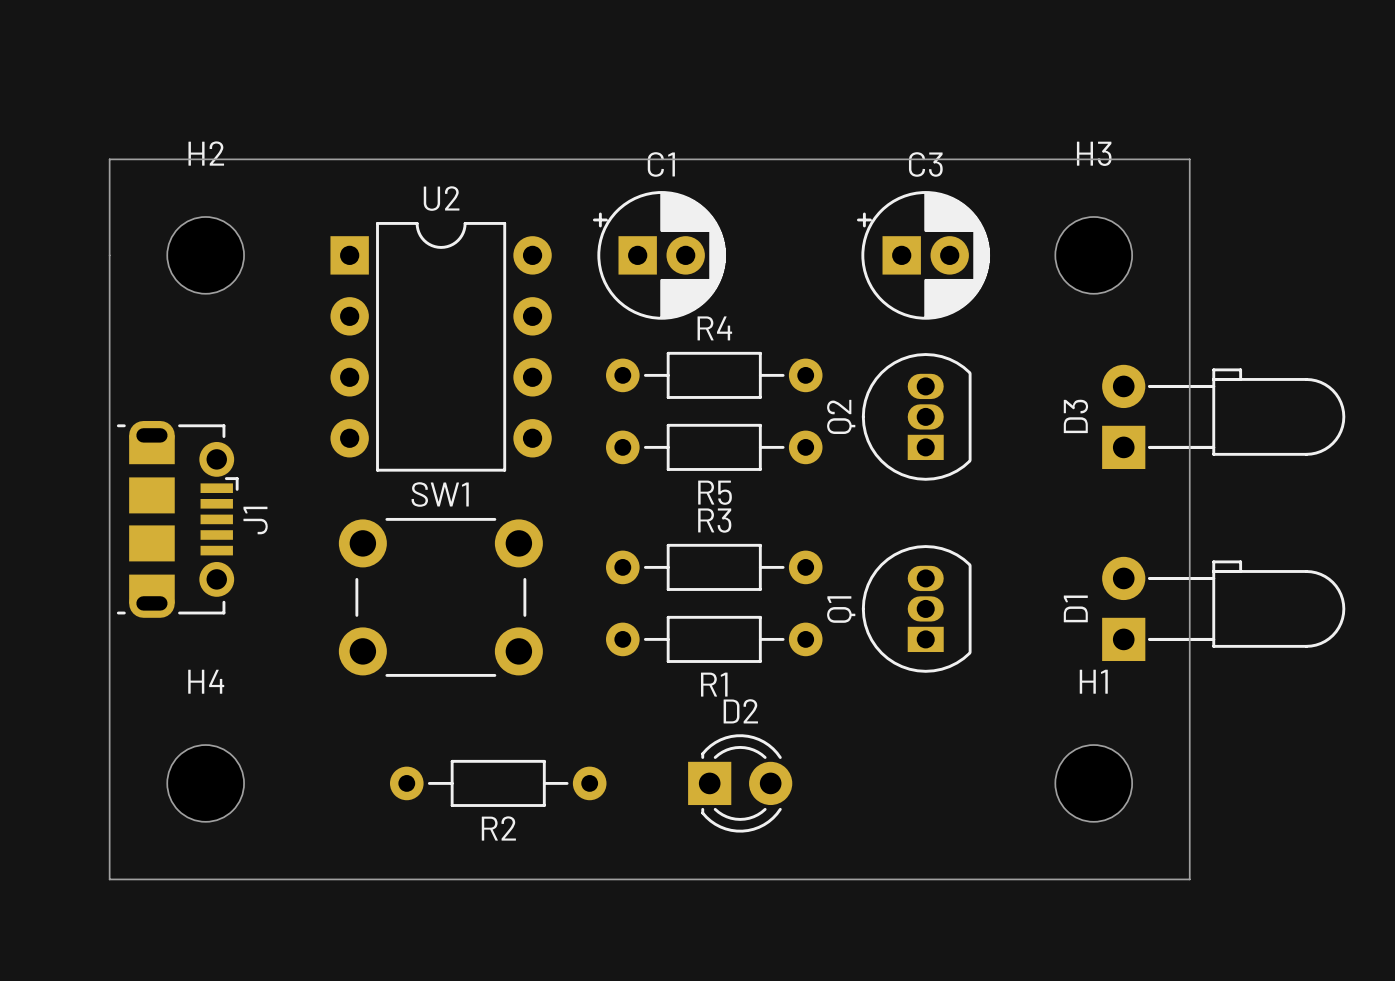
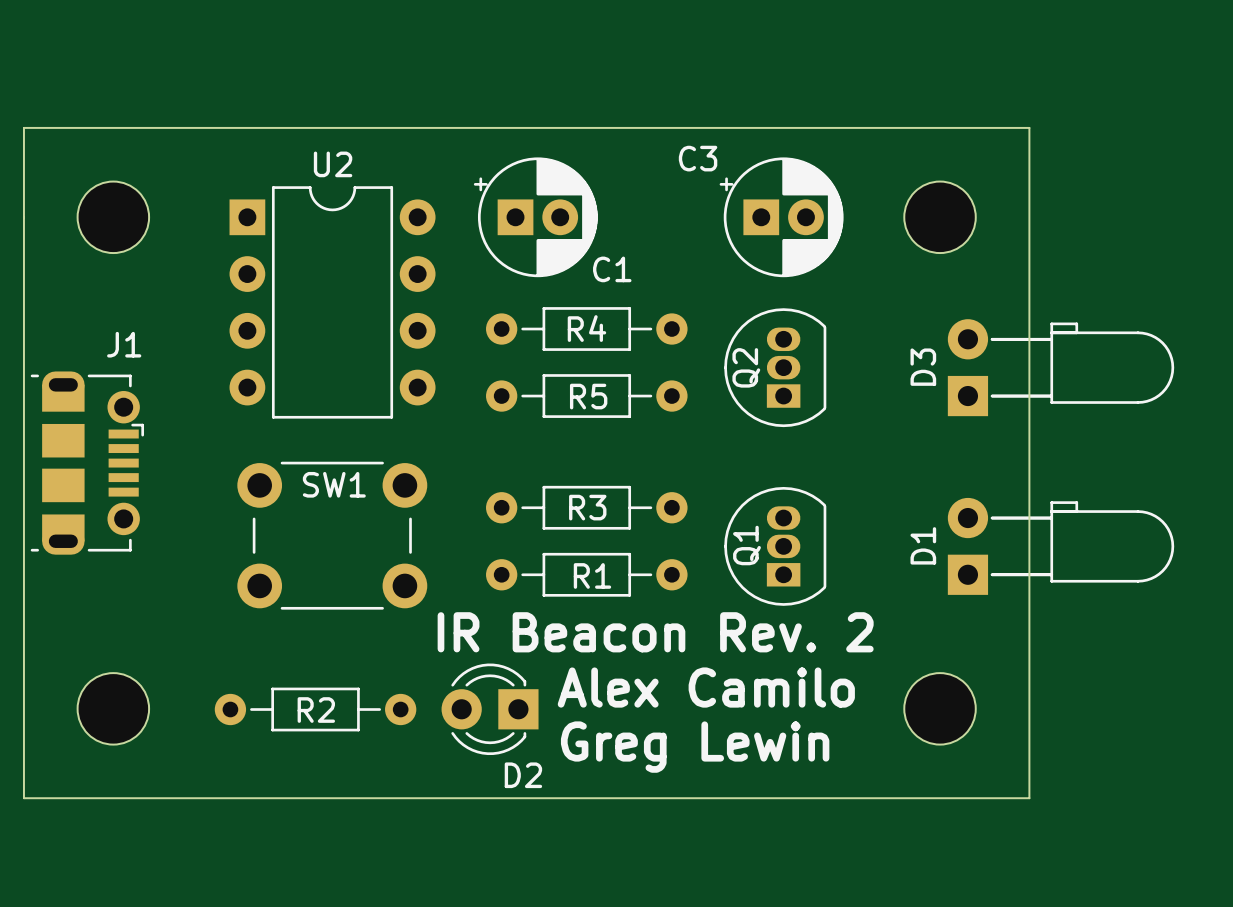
H2 name: H2 (206, 153) -> none
H3 name: H3 (1094, 153) -> none
C1 name position: C1 (661, 164) -> C1 (612, 269)
C3 name position: C3 (925, 164) -> C3 (698, 158)
R4 name position: R4 (714, 328) -> R4 (586, 328)
Q2 name position: Q2 (841, 416) -> Q2 (746, 367)
R5 name position: R5 (715, 492) -> R5 (588, 396)
SW1 name position: SW1 (440, 494) -> SW1 (334, 484)
J1 name rotation: 0° (255, 520) -> 90° clockwise (124, 344)
J1 name position: J1 (255, 520) -> J1 (124, 344)
R3 name position: R3 (714, 520) -> R3 (587, 507)
Q1 name position: Q1 (841, 609) -> Q1 (746, 545)
H4 name: H4 (206, 681) -> none
H1 name: H1 (1093, 681) -> none
R1 name position: R1 (714, 684) -> R1 (592, 575)
text: none -> IR Beacon Rev. 2 (655, 632)
text: none -> Alex Camilo (706, 687)
R2 position: (498, 783) -> (315, 709)
D2 rotation: 0° (740, 783) -> 180° (490, 709)
D2 position: (740, 783) -> (490, 709)
text: none -> Greg Lewin (695, 747)
R2 name position: R2 (498, 828) -> R2 (316, 710)

